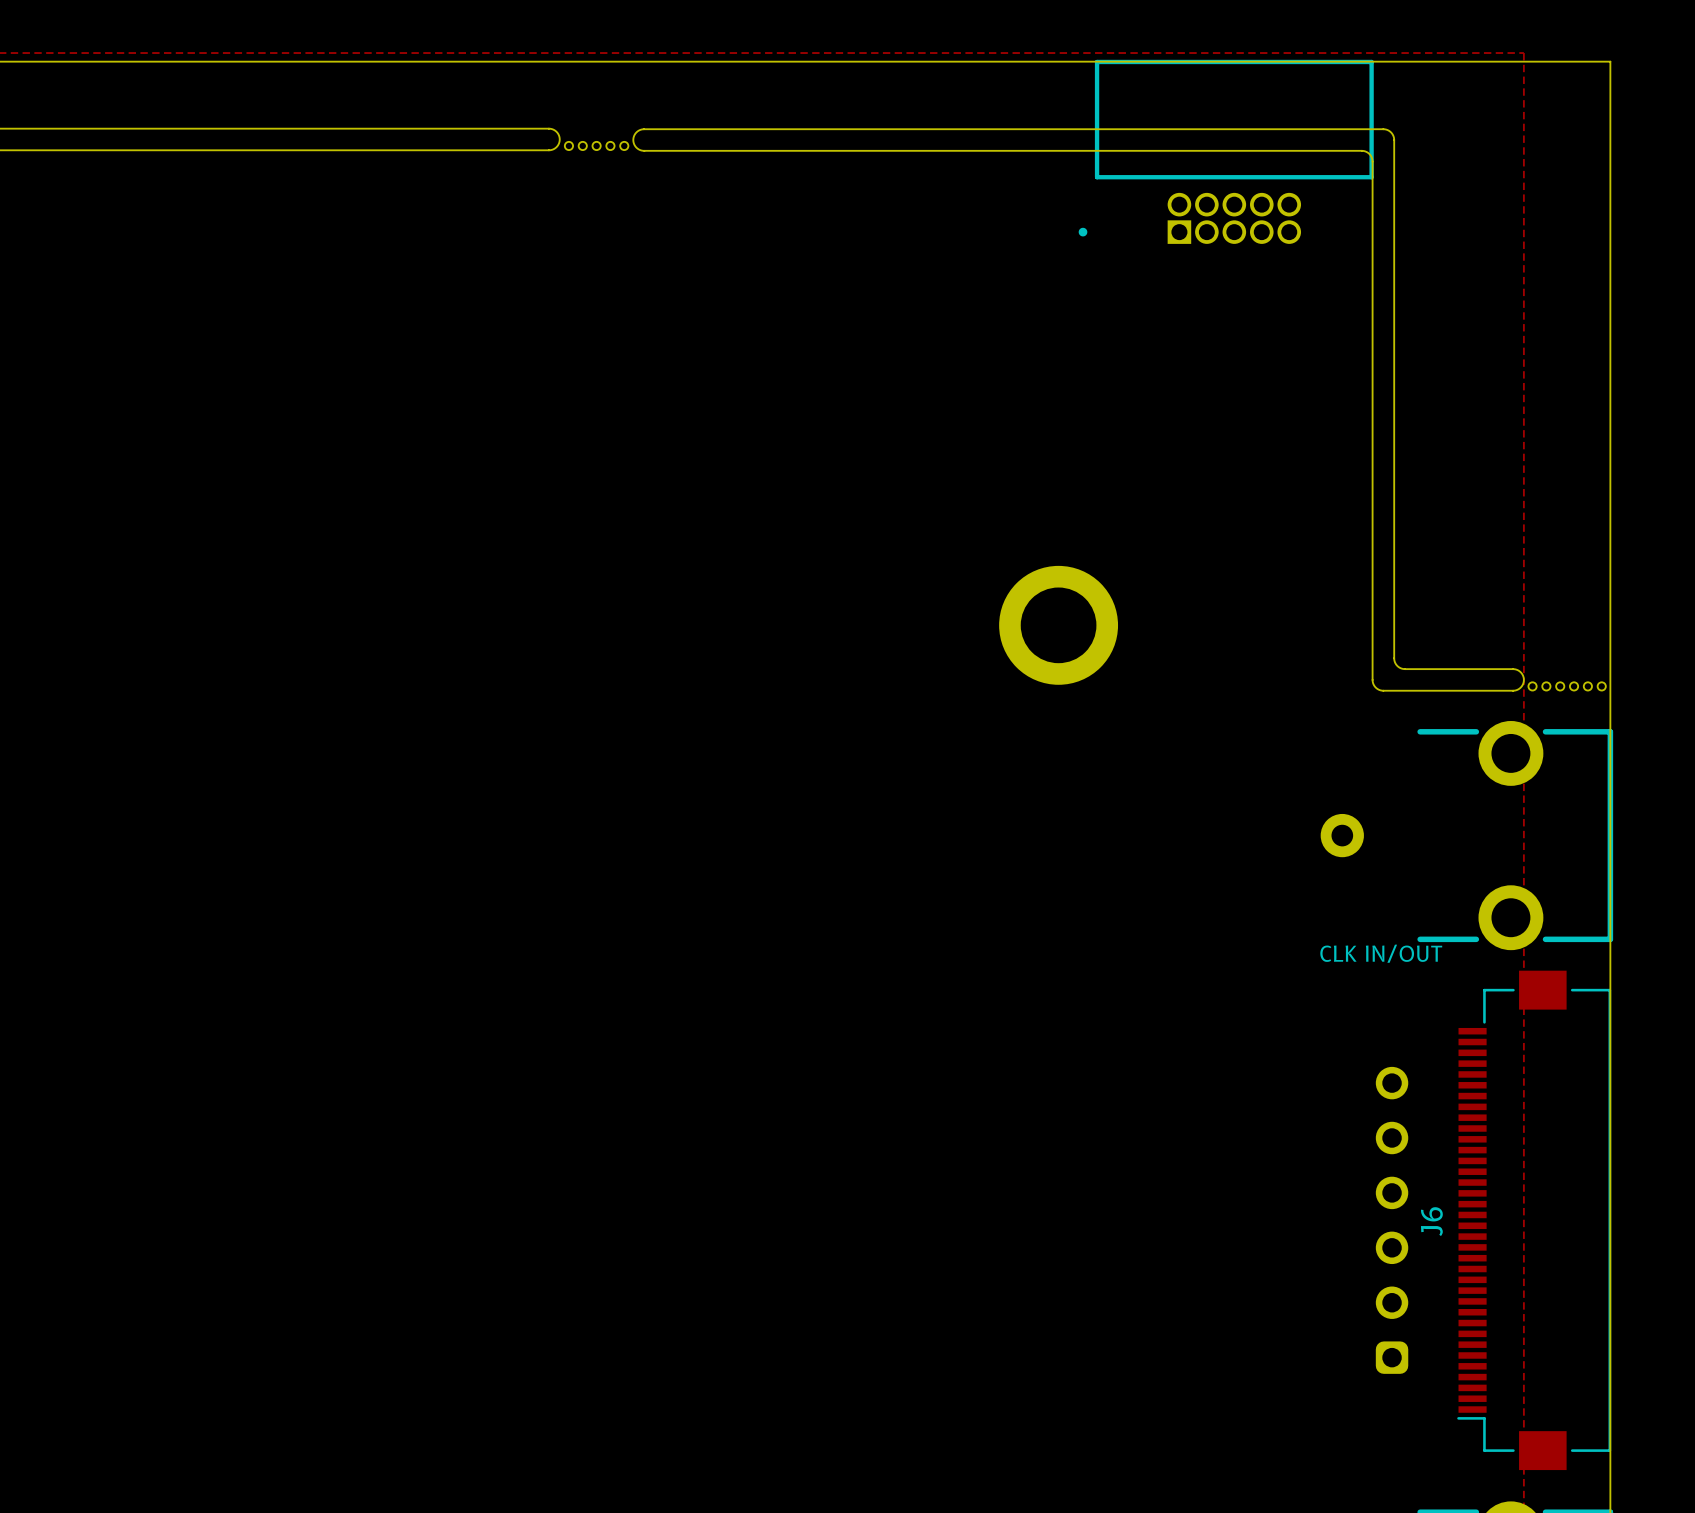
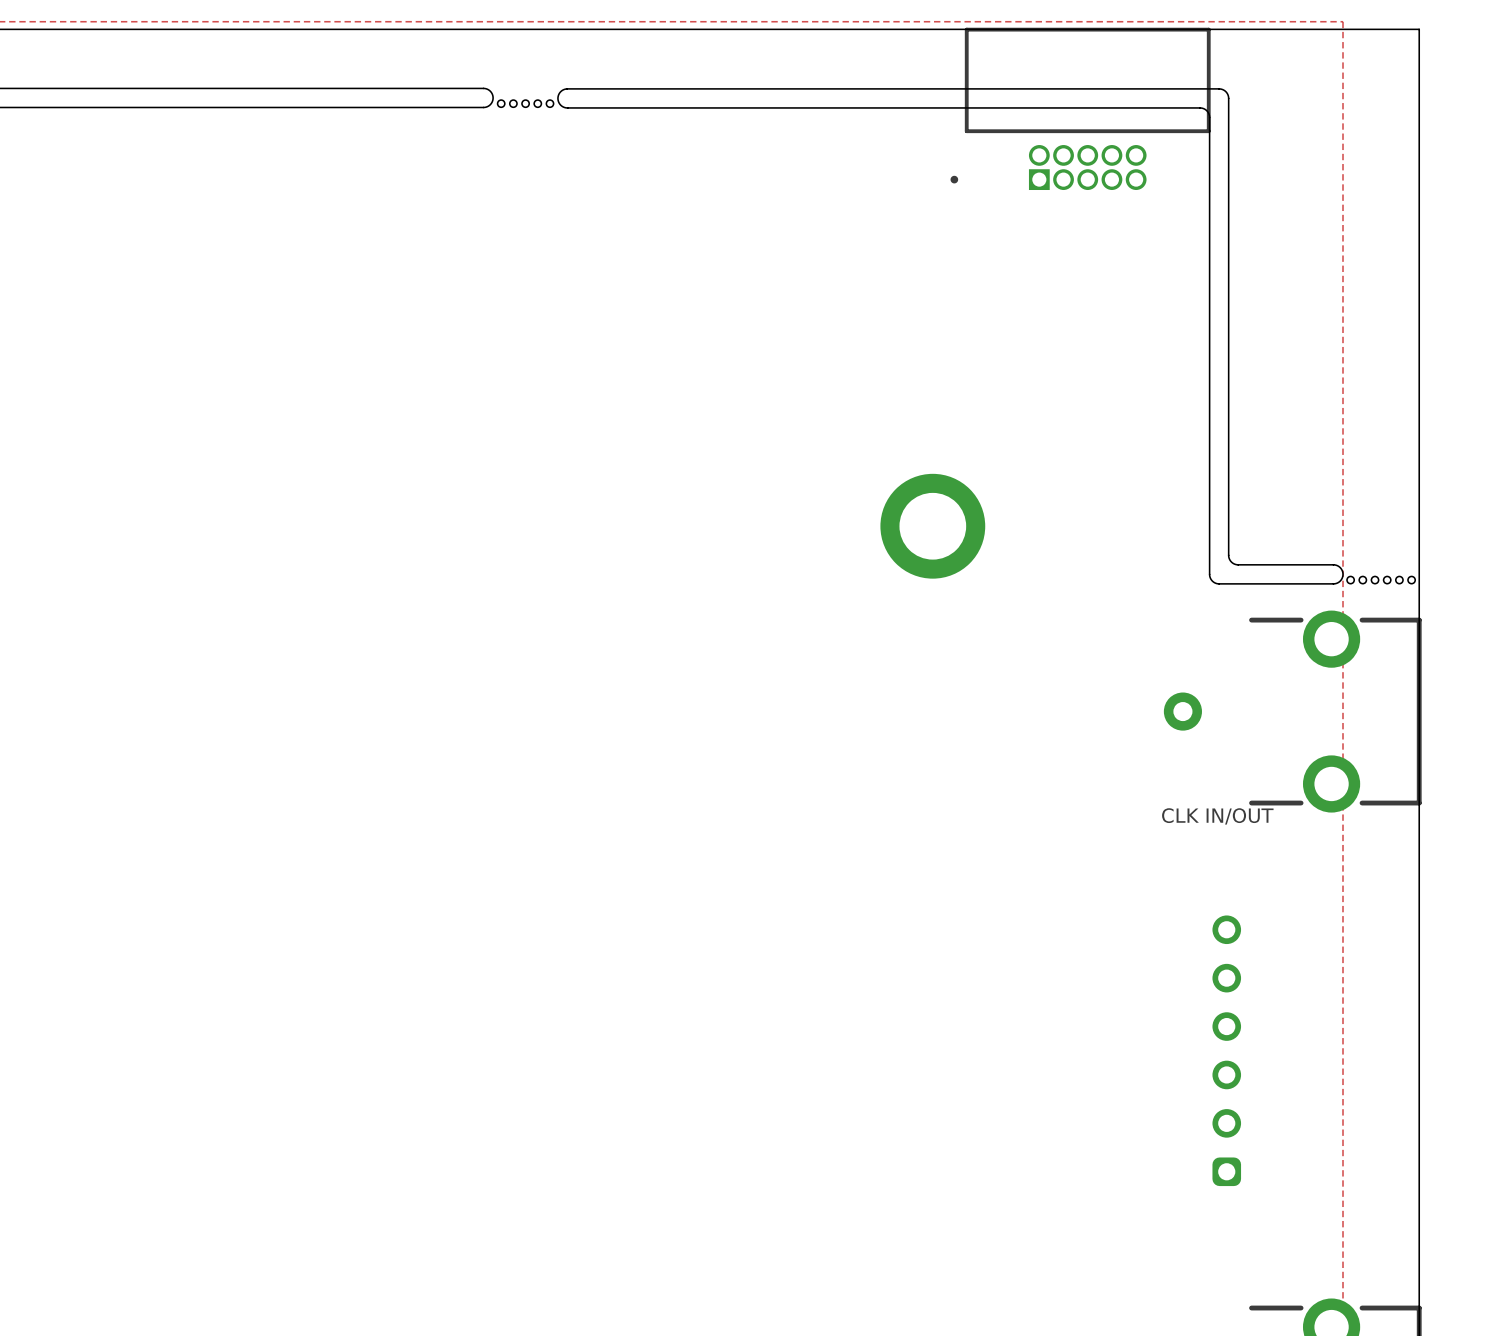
J6: (1534, 1220) -> none

